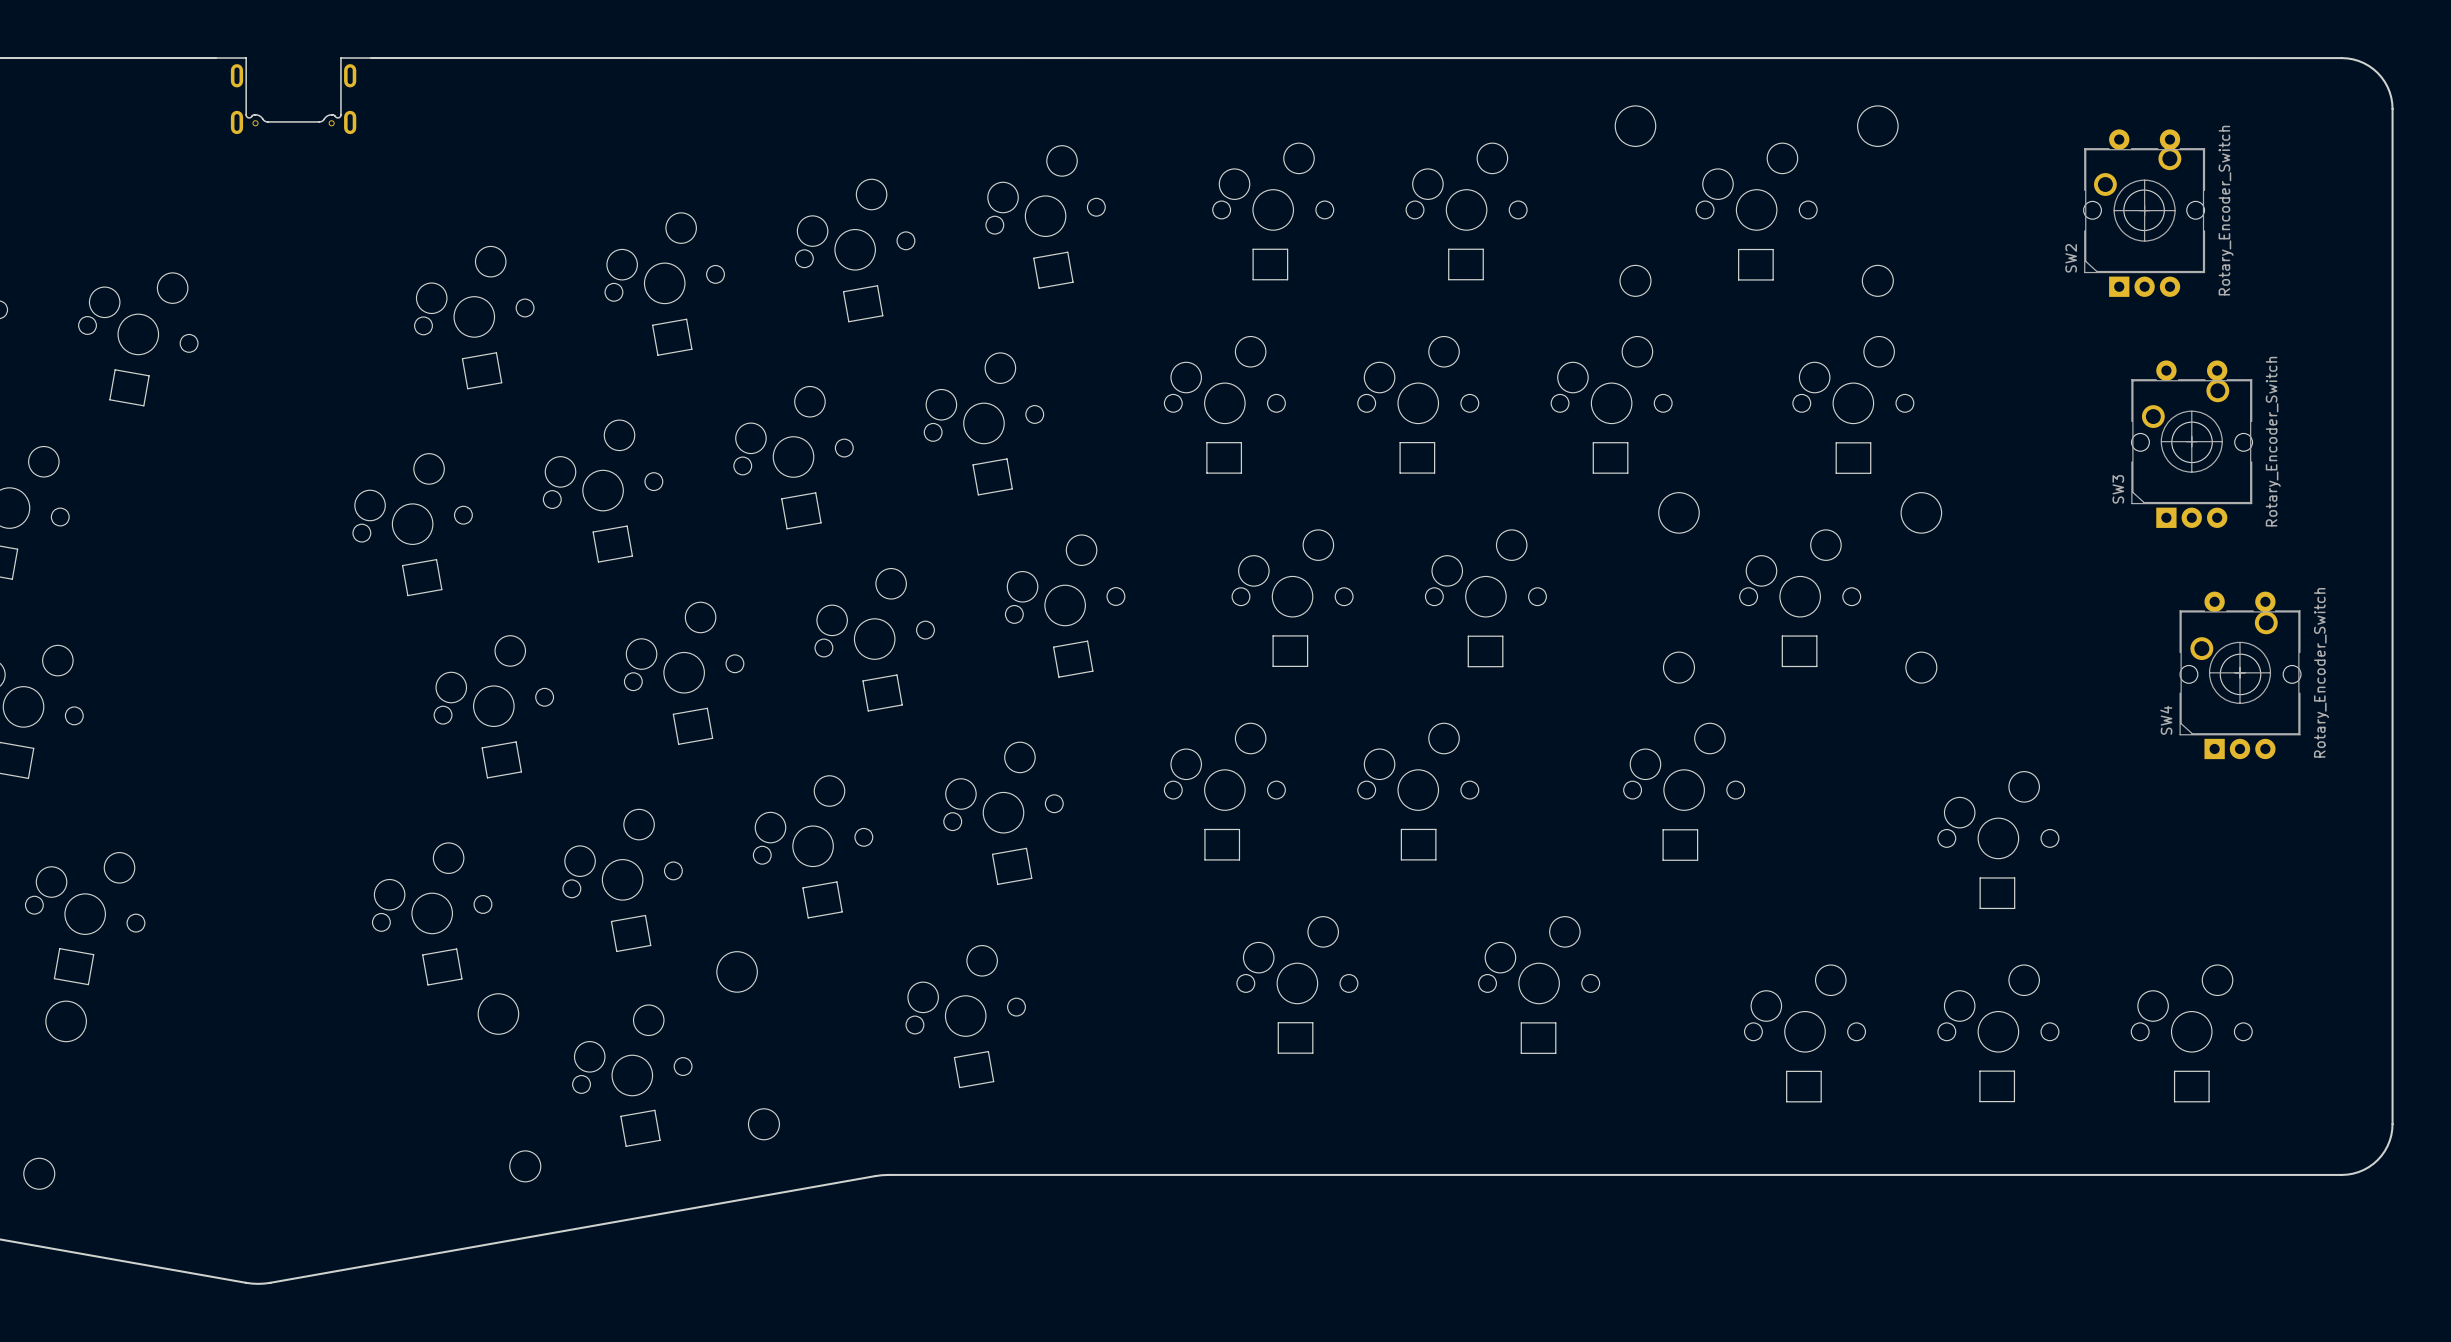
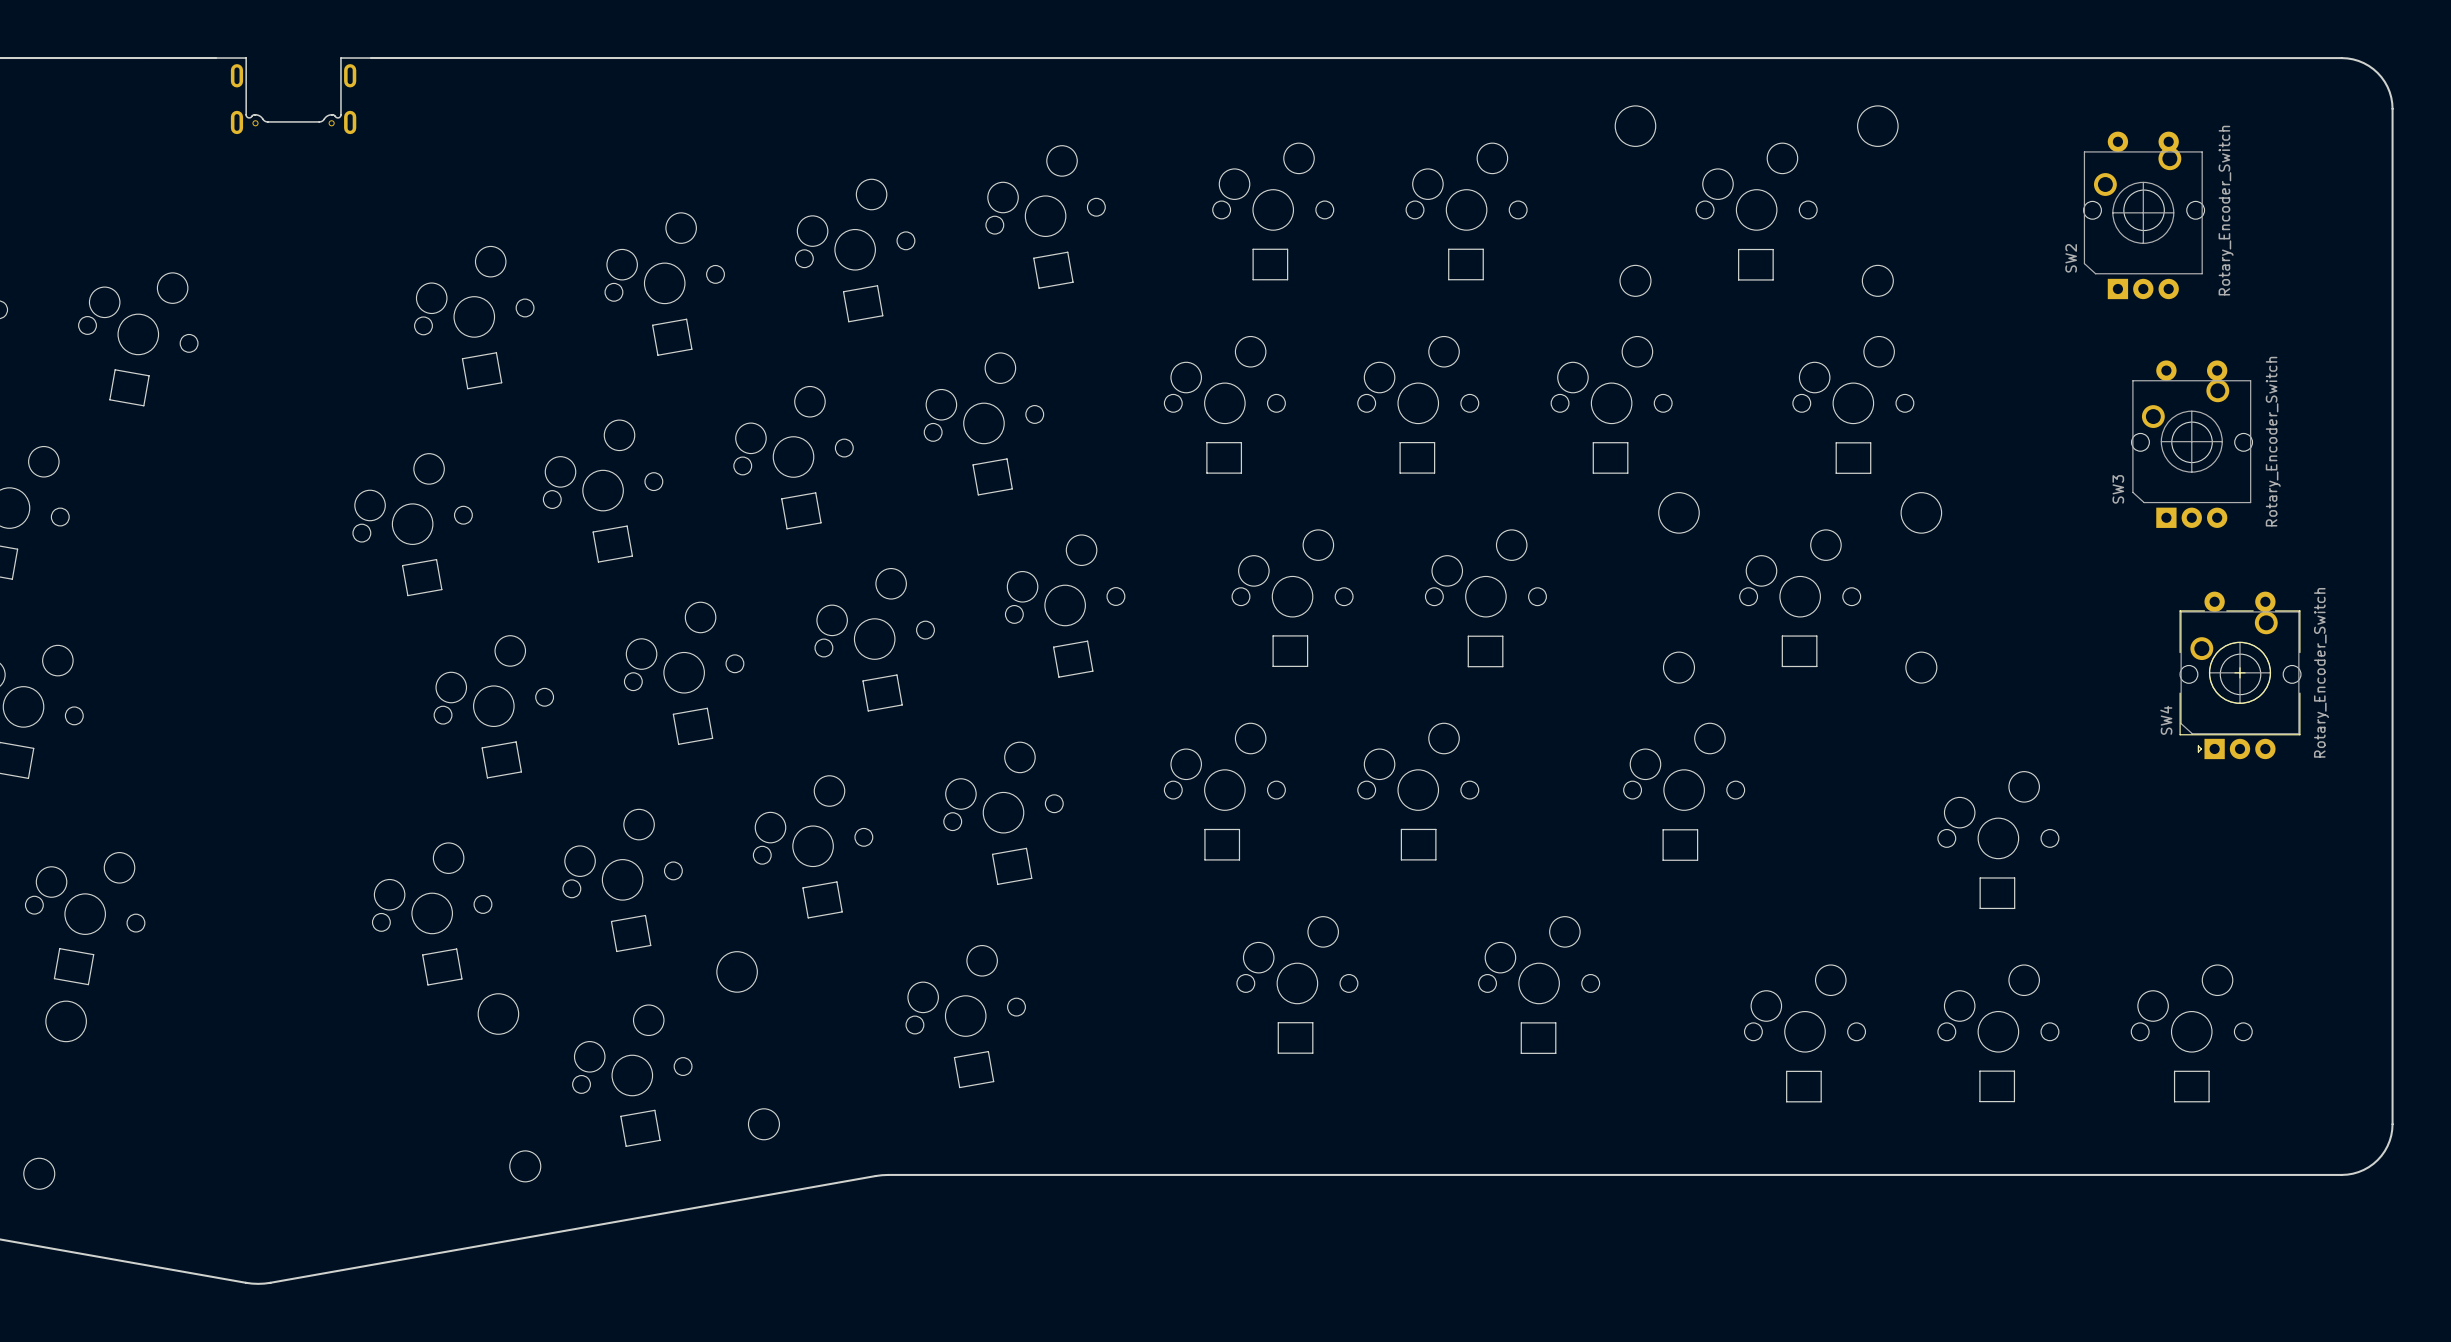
SW2 footprint: [2080, 129, 2210, 297] -> [2078, 131, 2208, 300]
SW3 footprint: [2127, 360, 2257, 528] -> [2127, 360, 2257, 528]
SW4 footprint: [2175, 591, 2305, 760] -> [2175, 591, 2305, 760]

